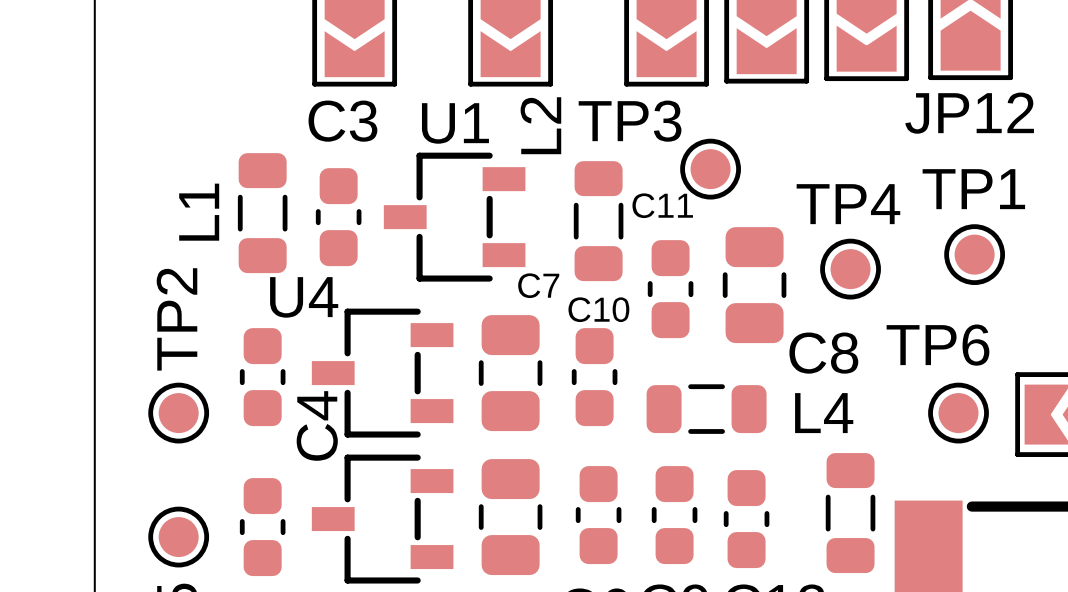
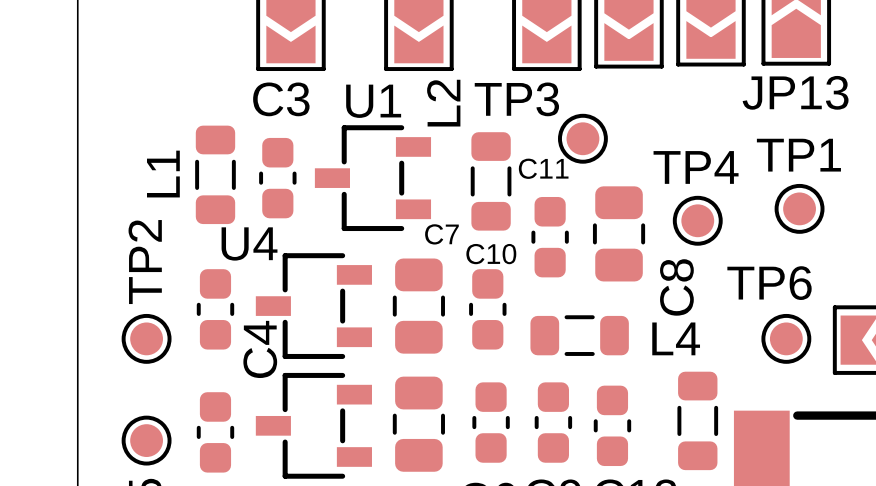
JP12 name: JP12 (969, 113) -> JP13 (795, 92)
C8 name rotation: 0° (823, 353) -> 90° counterclockwise (676, 287)

